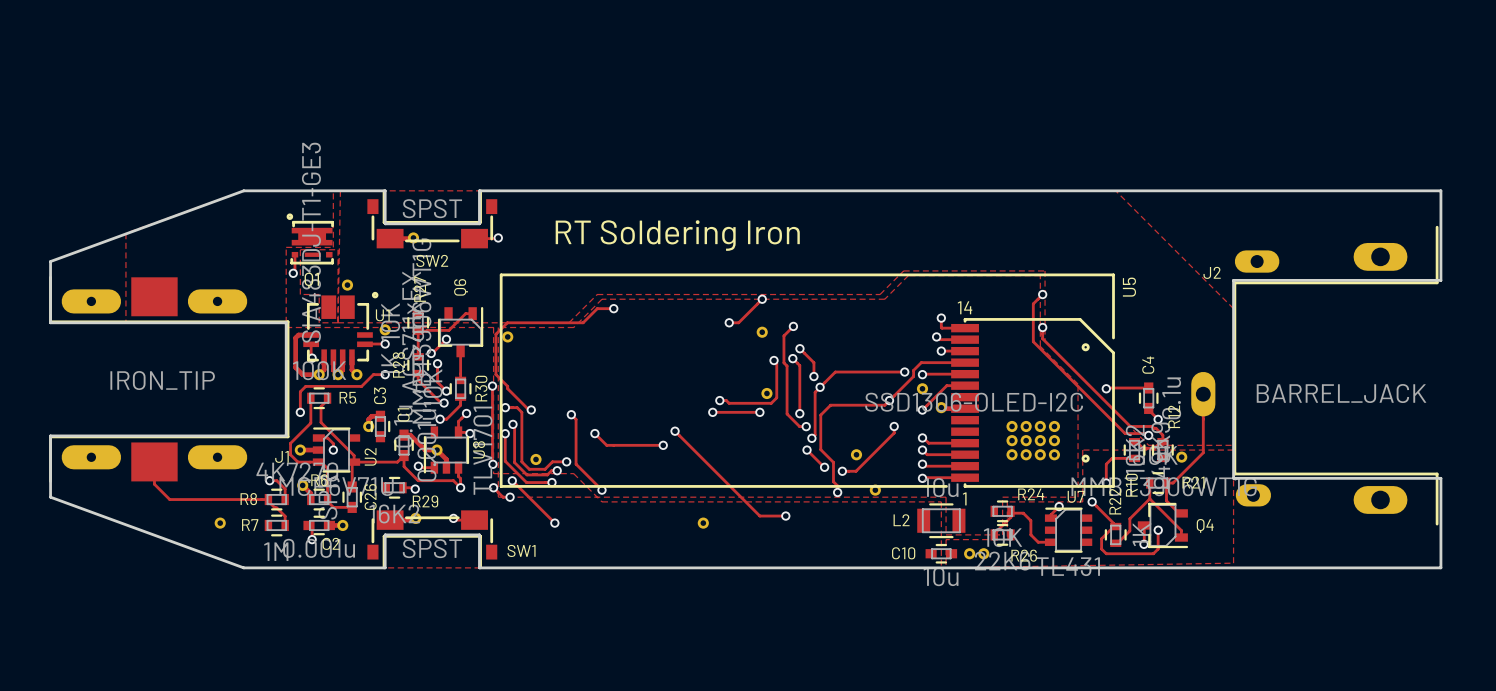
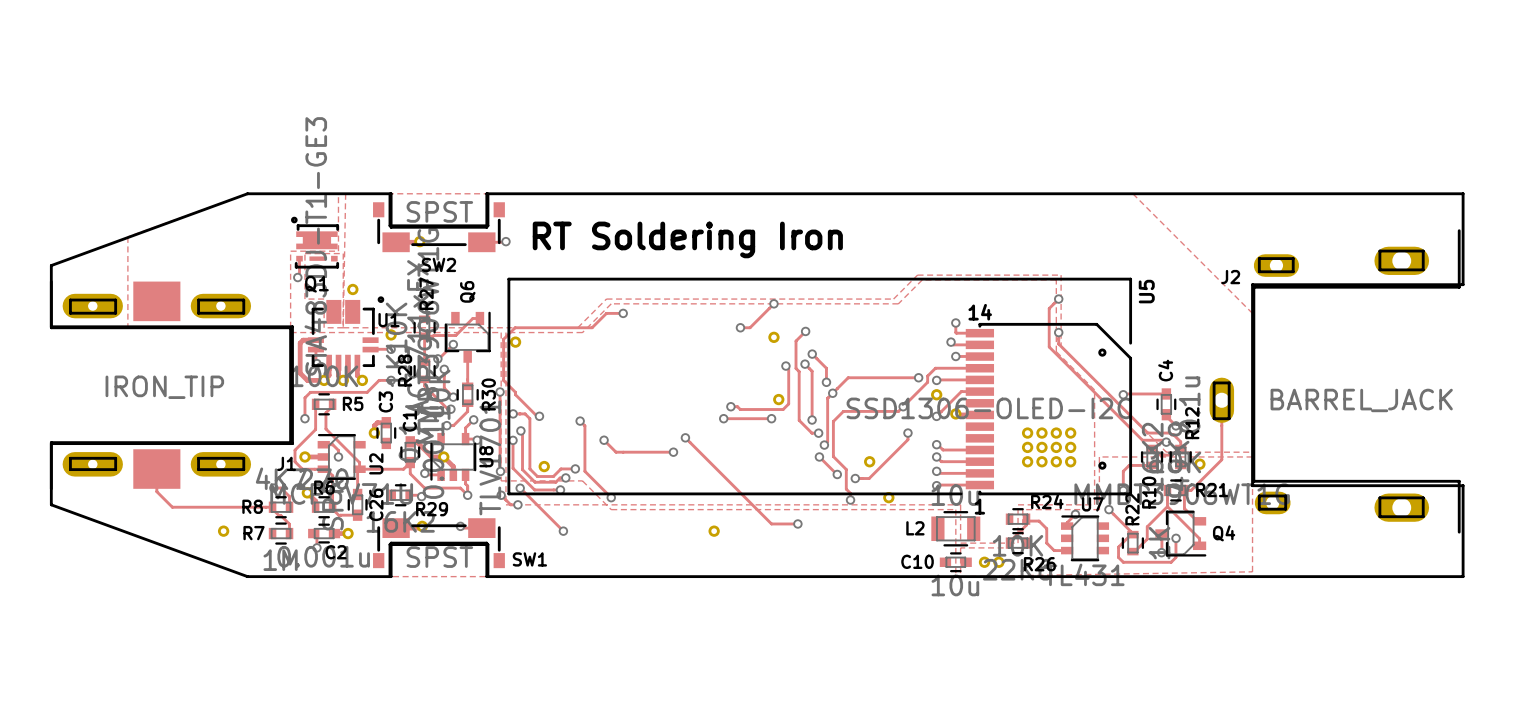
board edge: none -> (1379, 251) (1379, 269) (1423, 269) (1423, 251) (1379, 251)
board edge: none -> (1259, 258) (1259, 271) (1293, 271) (1293, 258) (1259, 258)
board edge: none -> (70, 300) (70, 313) (115, 313) (115, 300) (70, 300)
board edge: none -> (198, 300) (198, 313) (243, 313) (243, 300) (198, 300)
board edge: none -> (1214, 382) (1214, 418) (1229, 418) (1229, 382) (1214, 382)
board edge: none -> (70, 458) (70, 469) (115, 469) (115, 458) (70, 458)
board edge: none -> (198, 458) (243, 458) (243, 469) (198, 469) (198, 458)
board edge: none -> (1259, 495) (1259, 509) (1285, 509) (1285, 495) (1259, 495)
board edge: none -> (1379, 497) (1379, 516) (1423, 516) (1423, 497) (1379, 497)

